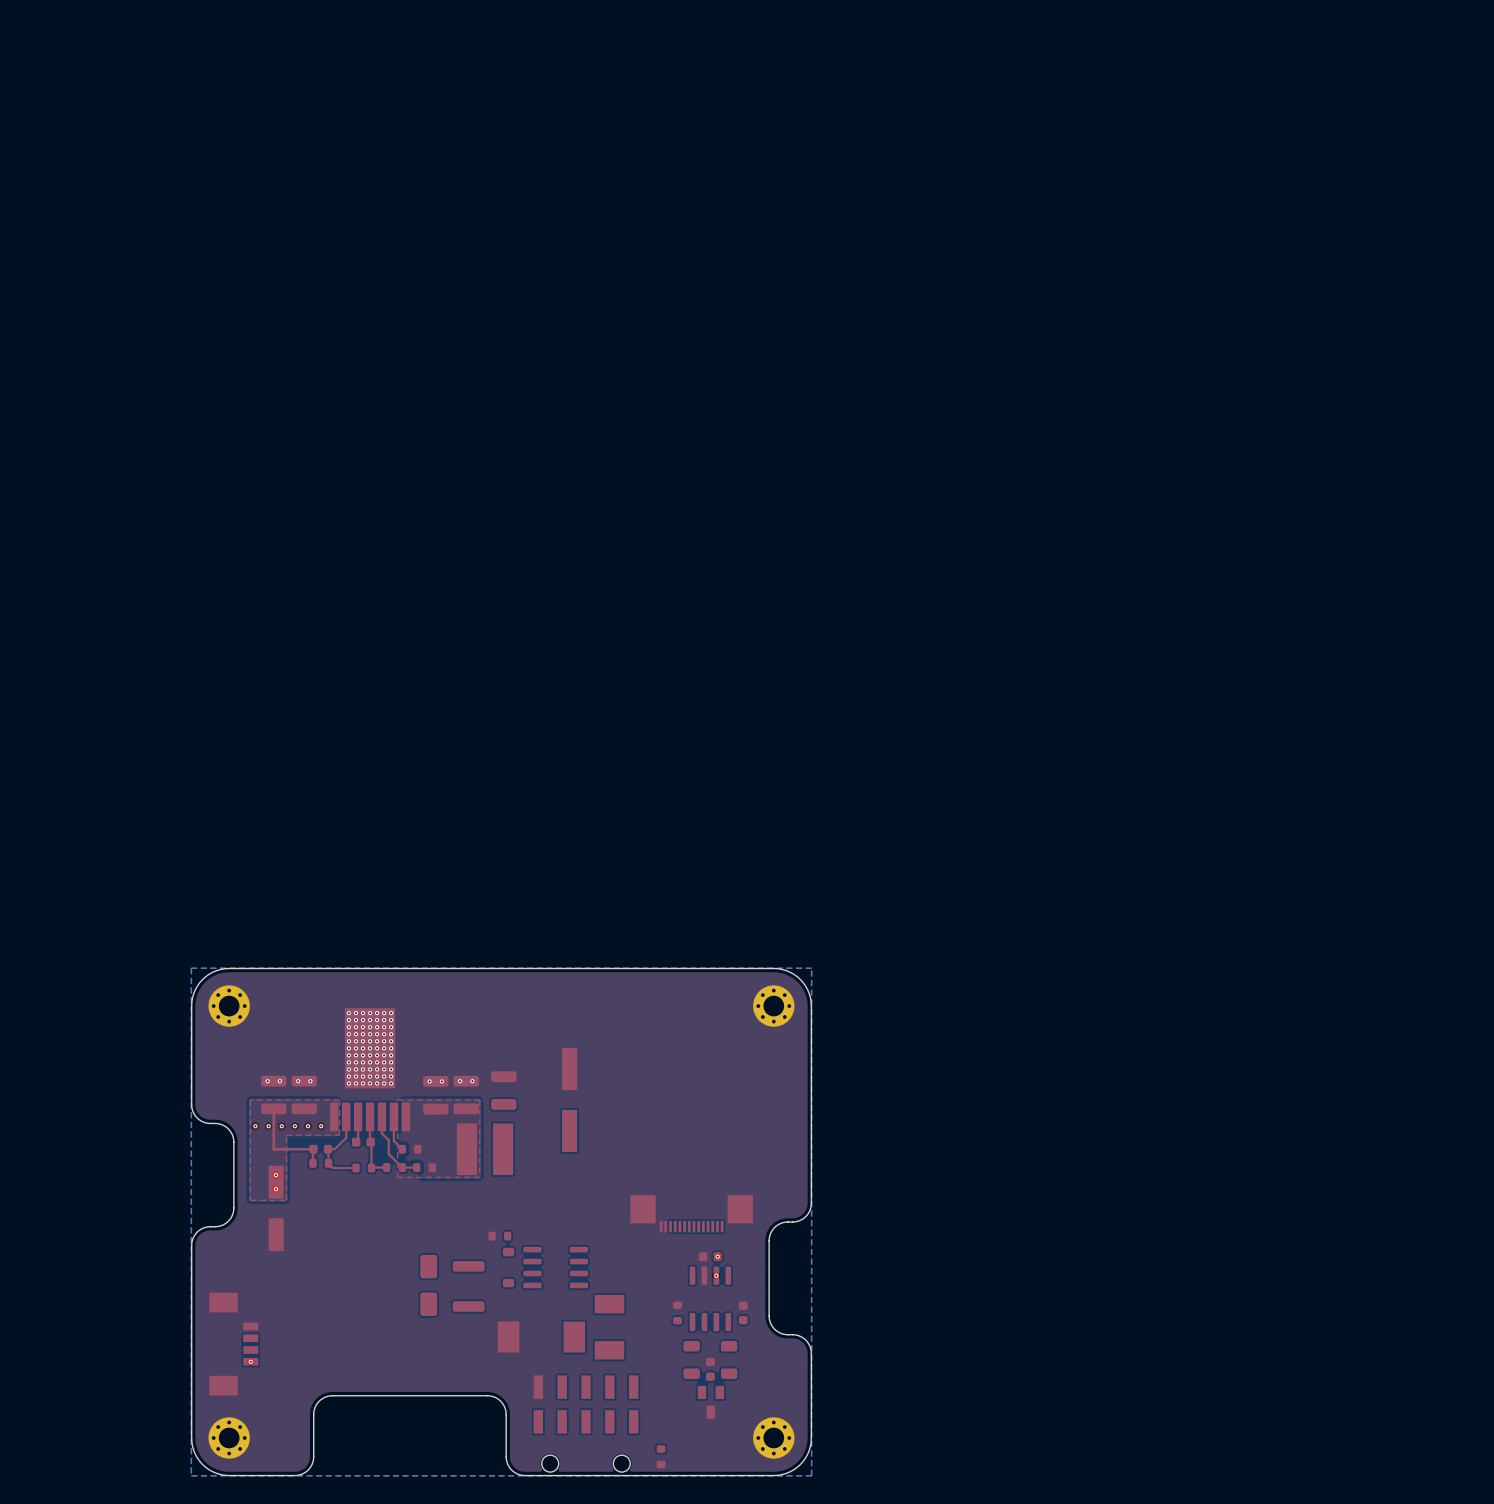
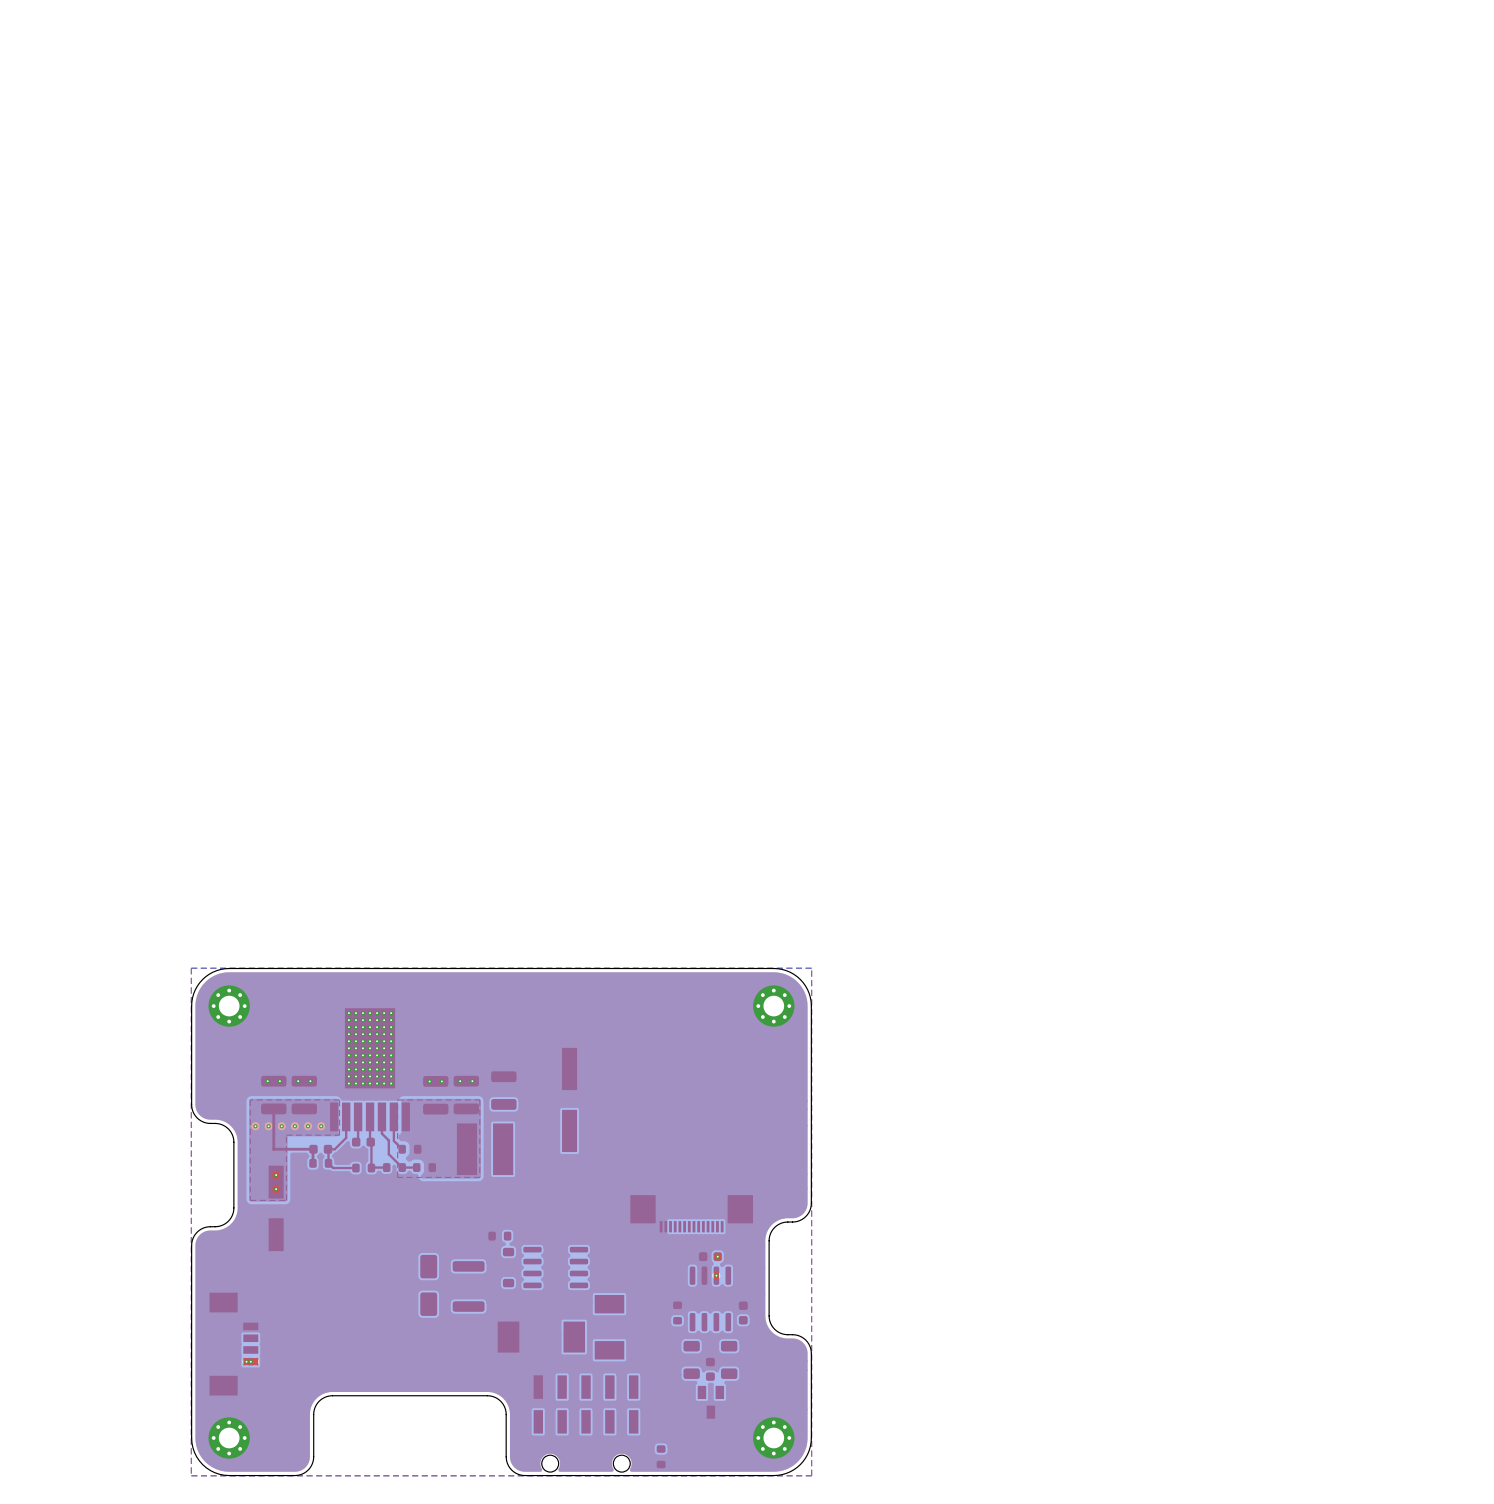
via: none -> (246, 1361)

